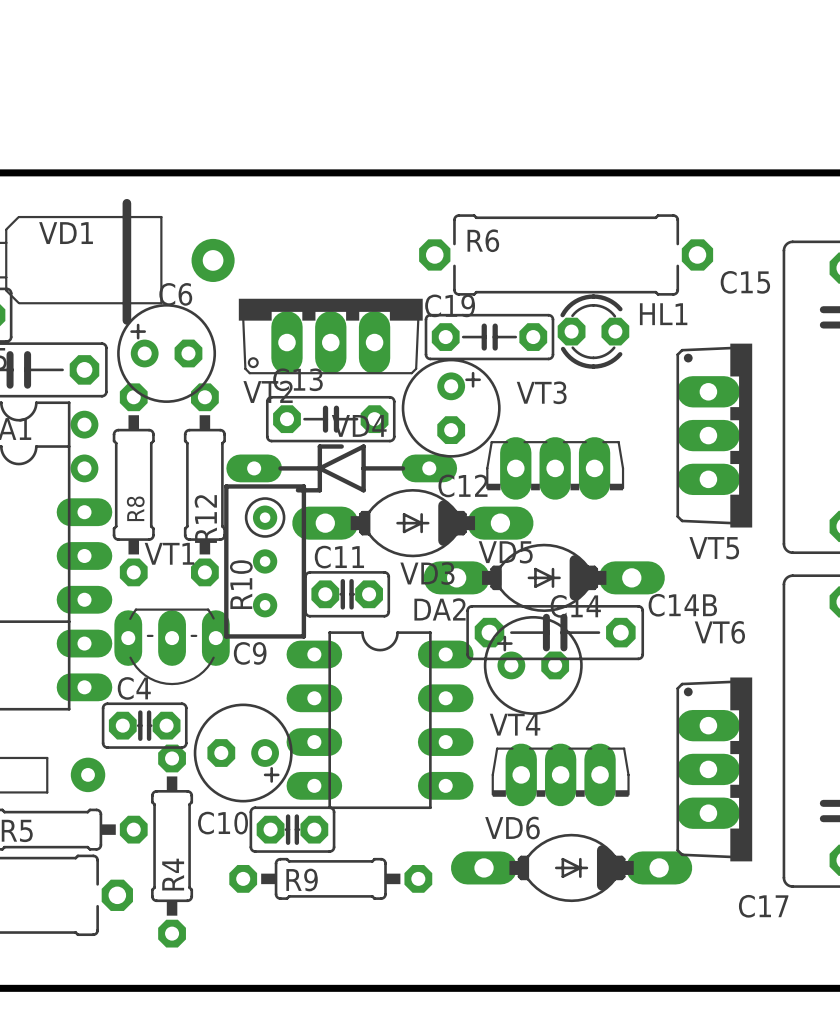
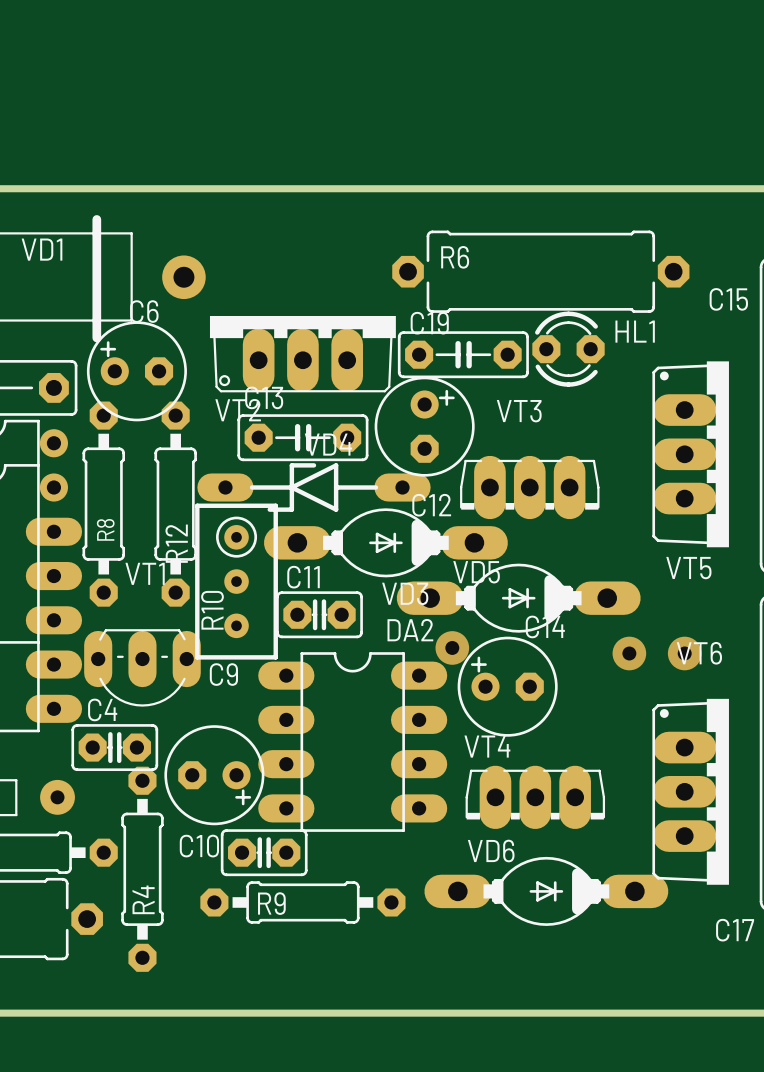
via: none -> (452, 647)
C14B: (555, 632) -> none
via: none -> (629, 653)
via: none -> (684, 653)

